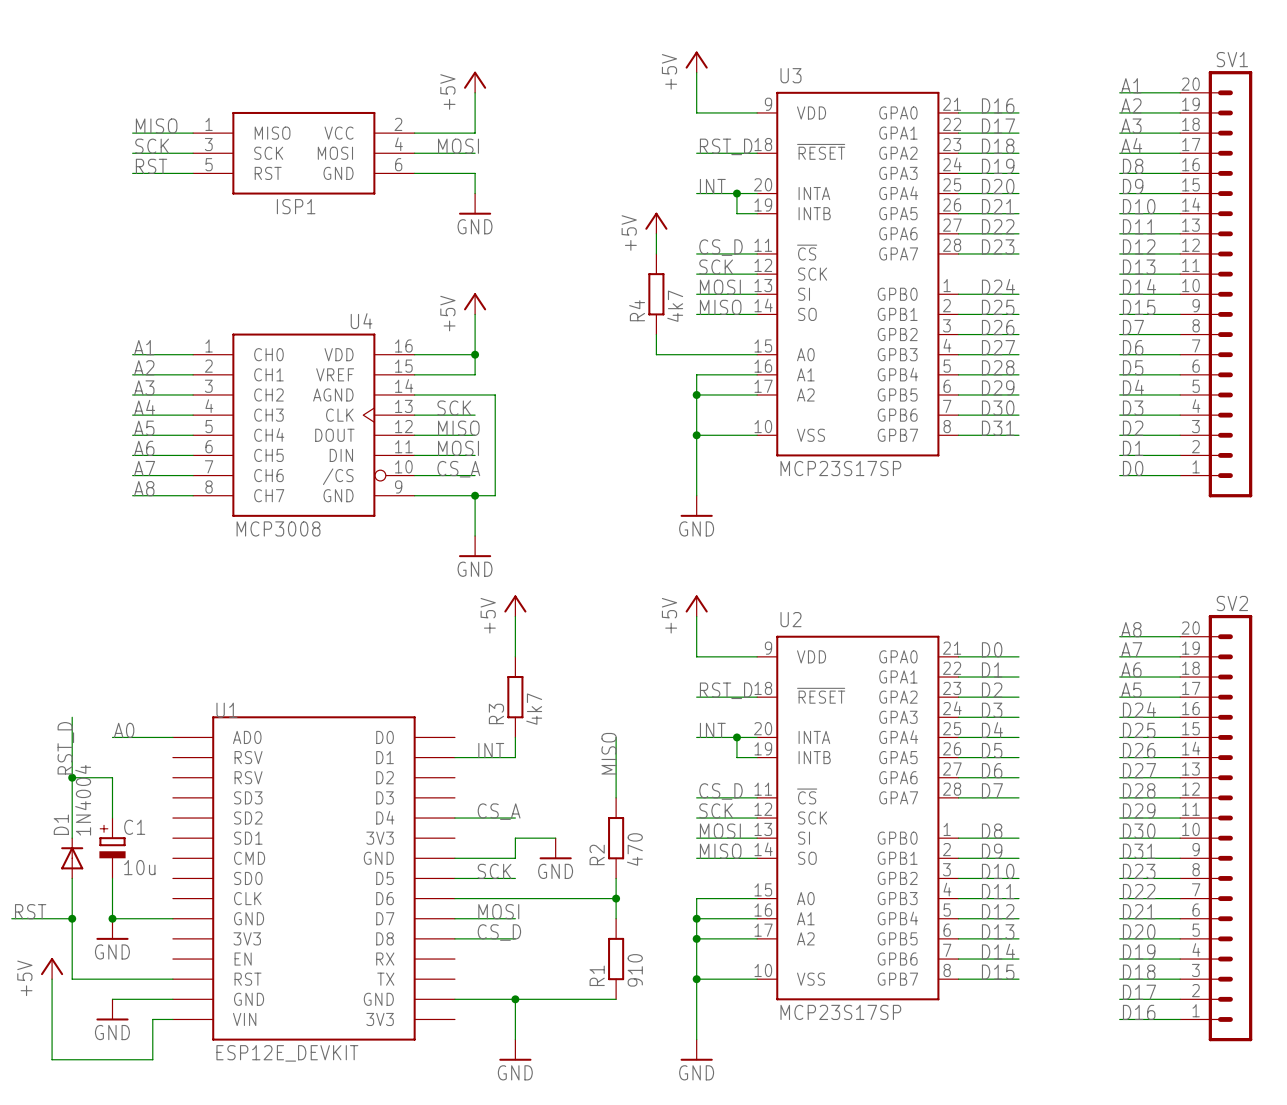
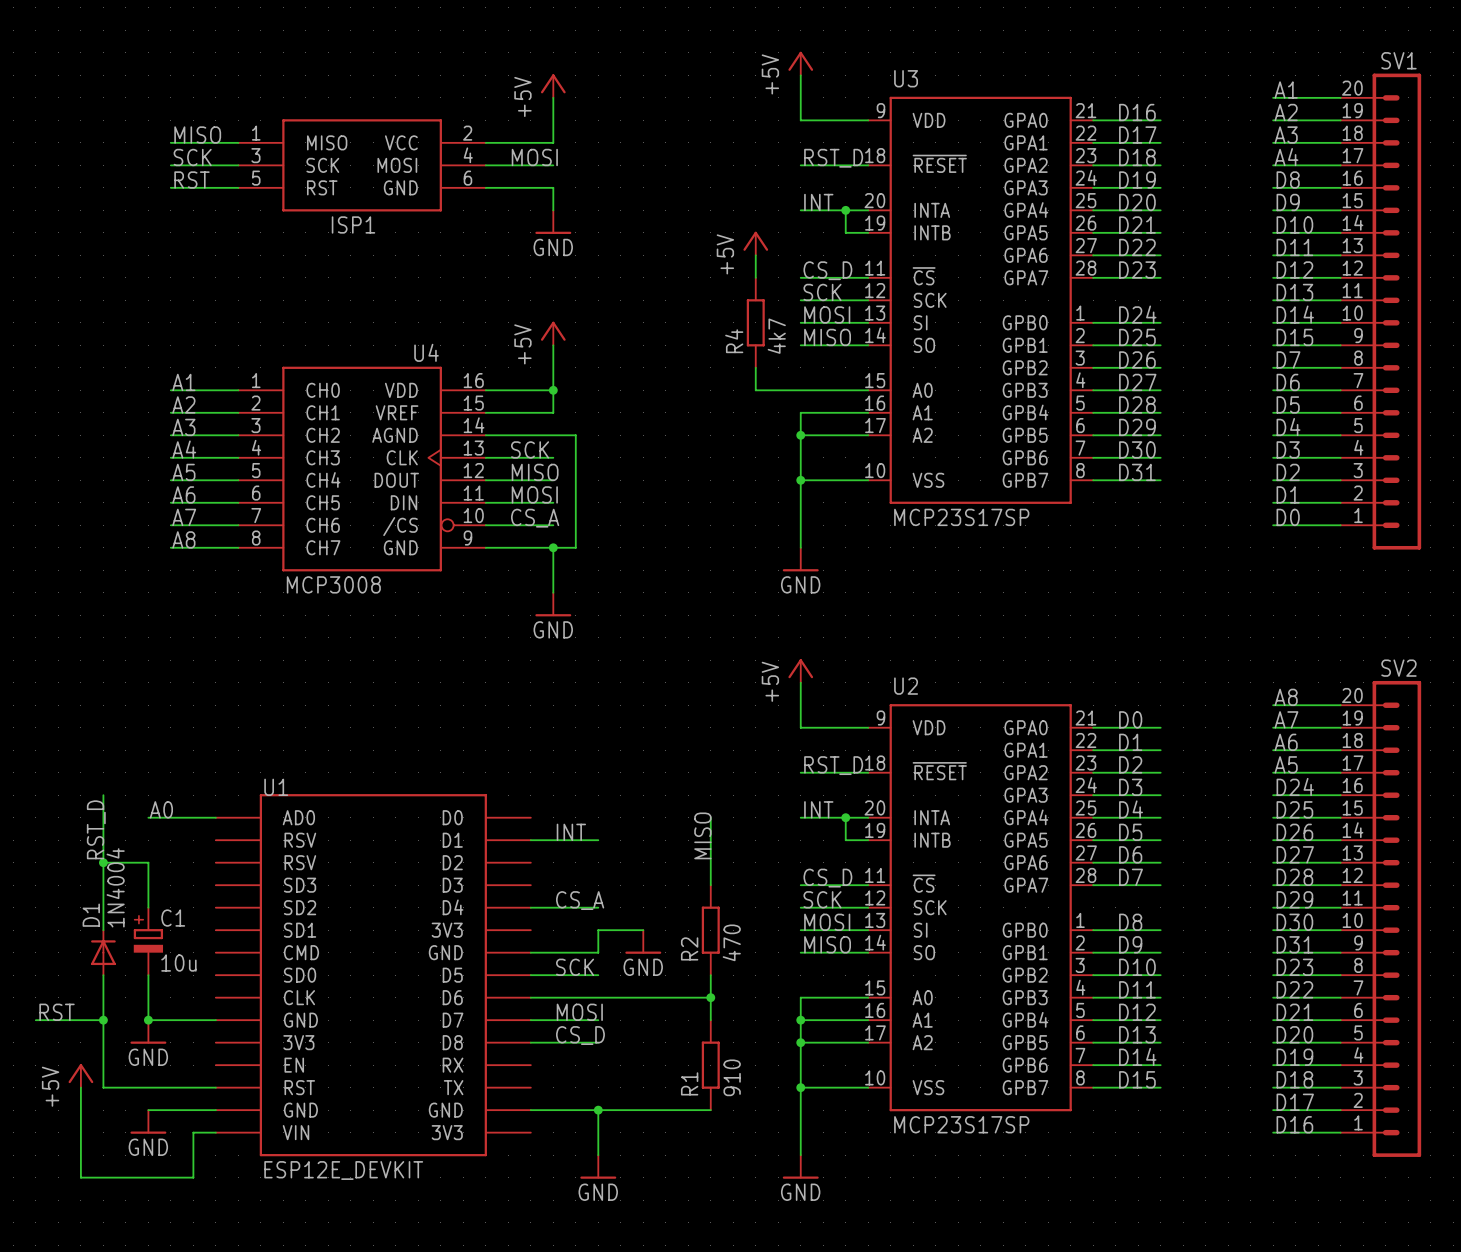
power symbol: +5V (515, 606) -> none
wire: (515, 616) (515, 656) -> none
R3: 4k7 (515, 697) -> none
wire: (515, 737) (515, 757) -> none

